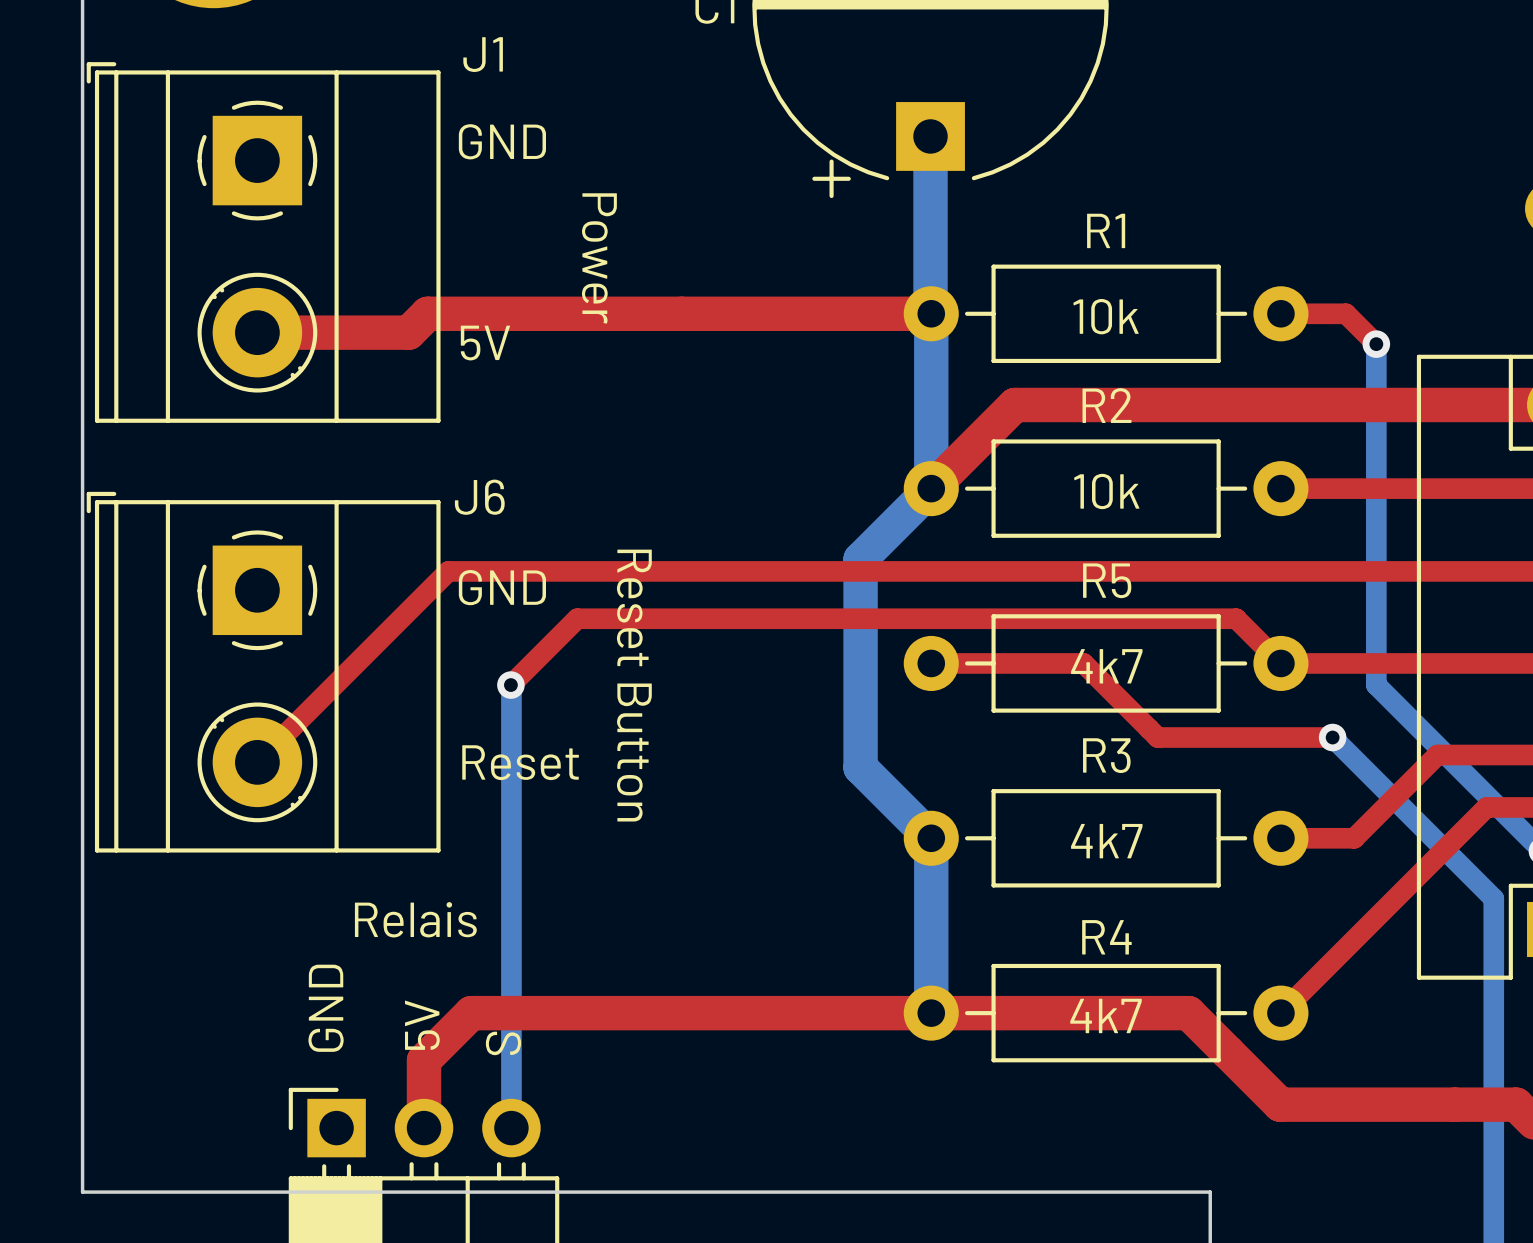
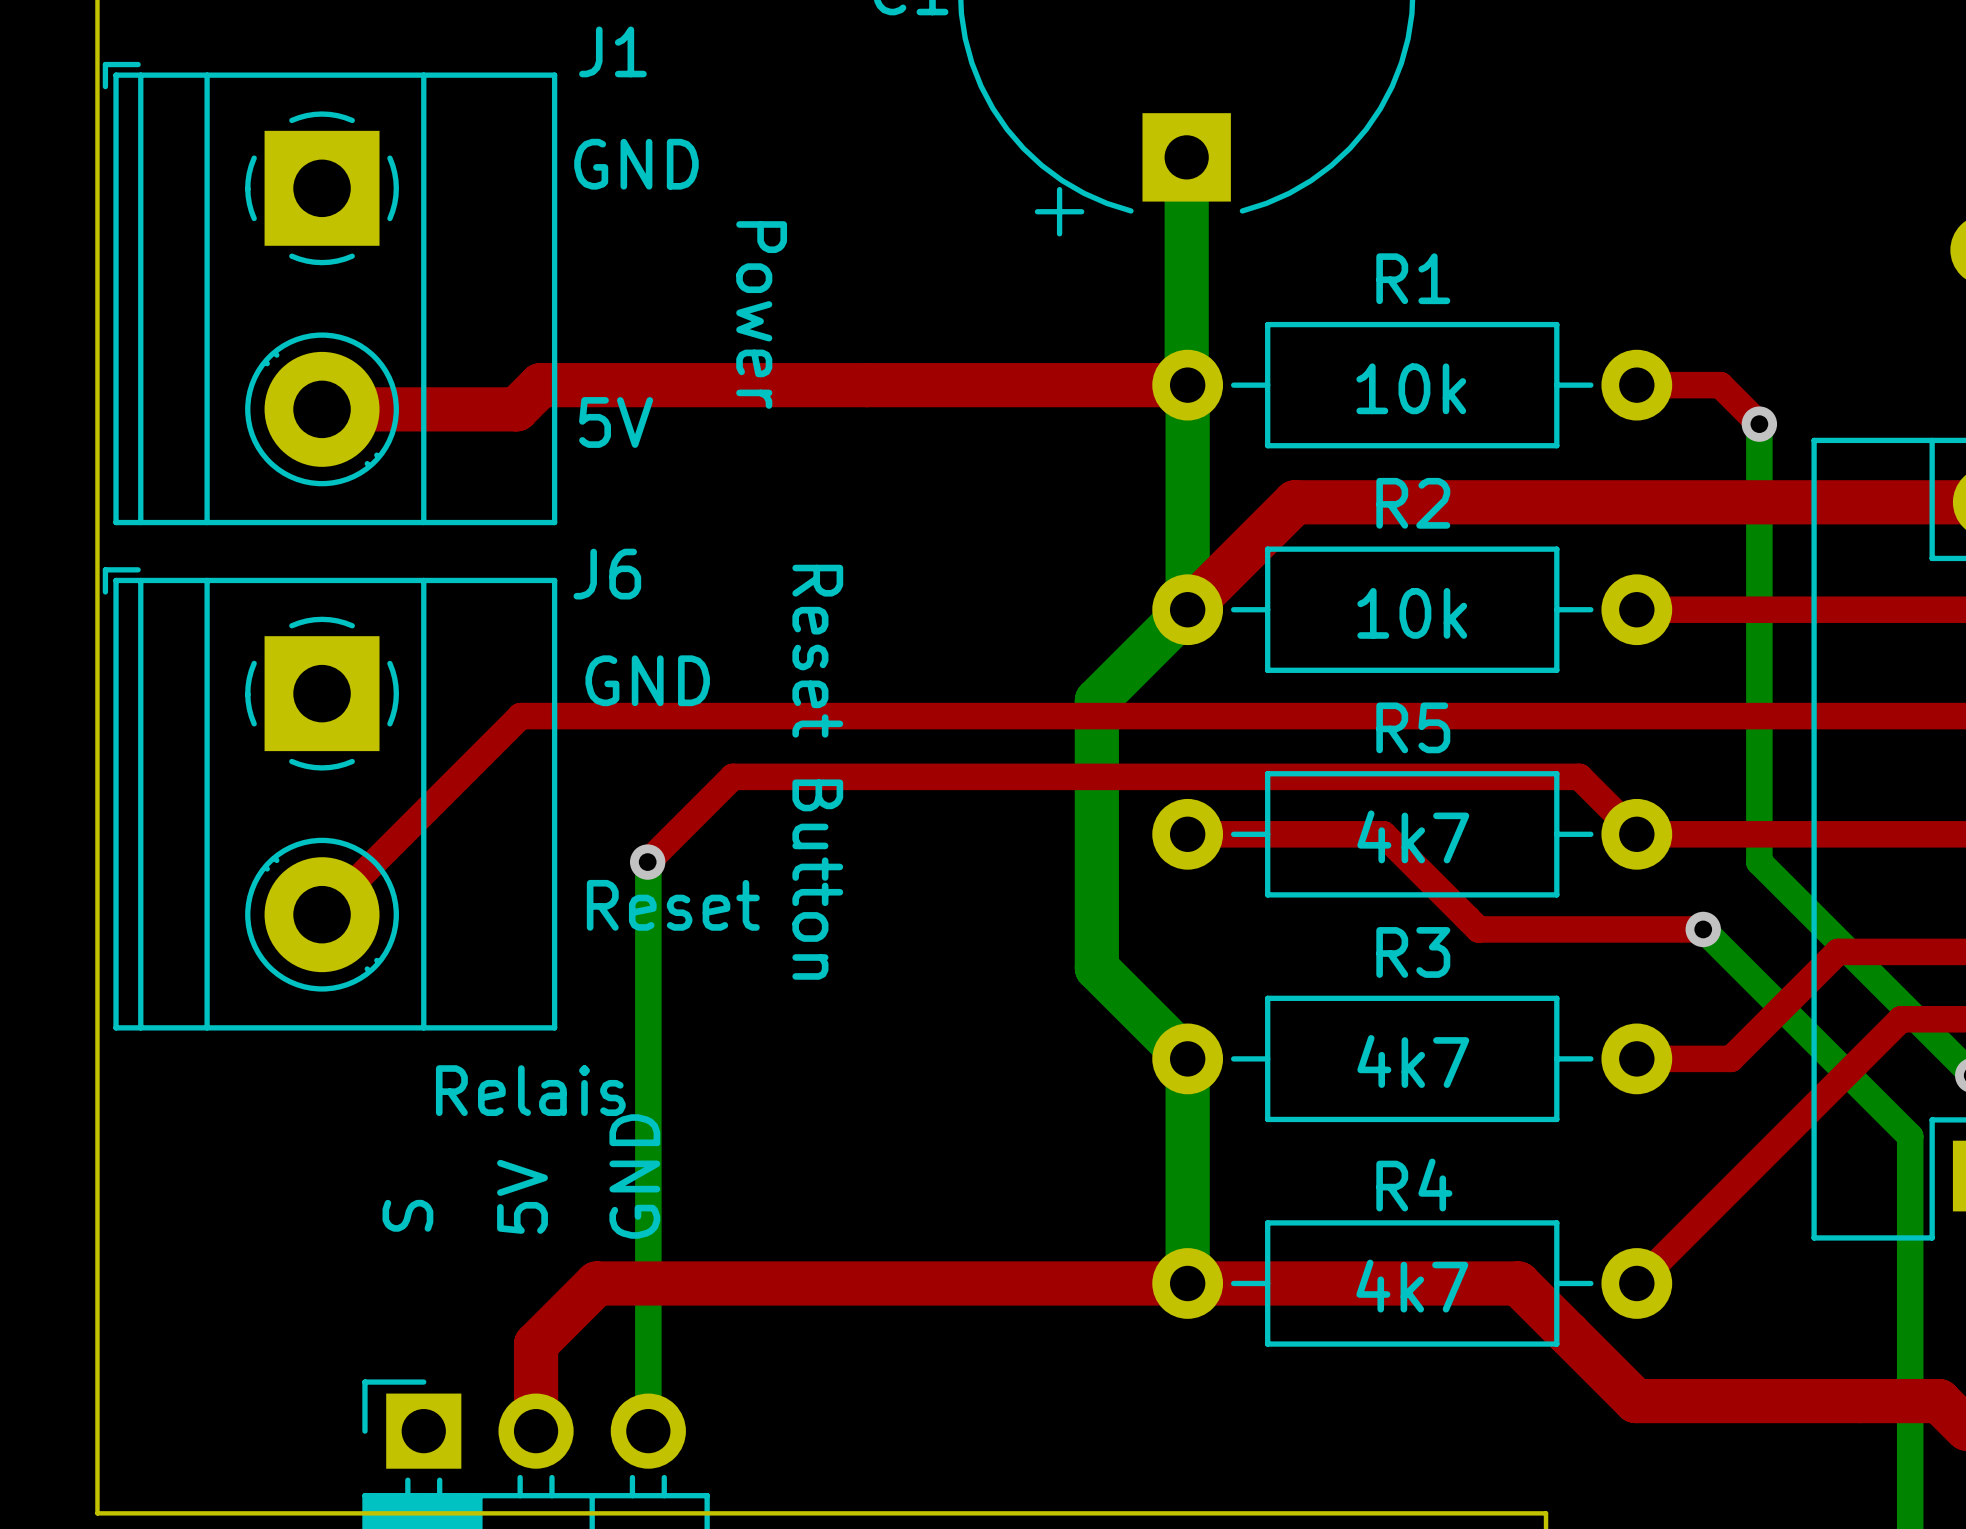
top track: (448, 571) (257, 762) -> (567, 716) (520, 716) (322, 914)
text position: GND (502, 587) -> GND (647, 680)
J6 position: (263, 672) -> (330, 798)
text position: Reset Button (634, 685) -> Reset Button (817, 772)
text position: Reset (520, 762) -> Reset (673, 905)
text: none -> Relais (530, 1090)
text: Relais (415, 919) -> 5V (522, 1196)
text: none -> GND (634, 1176)
text: GND (326, 1008) -> none
text: 5V (422, 1025) -> none
text position: S (503, 1043) -> S (407, 1215)

